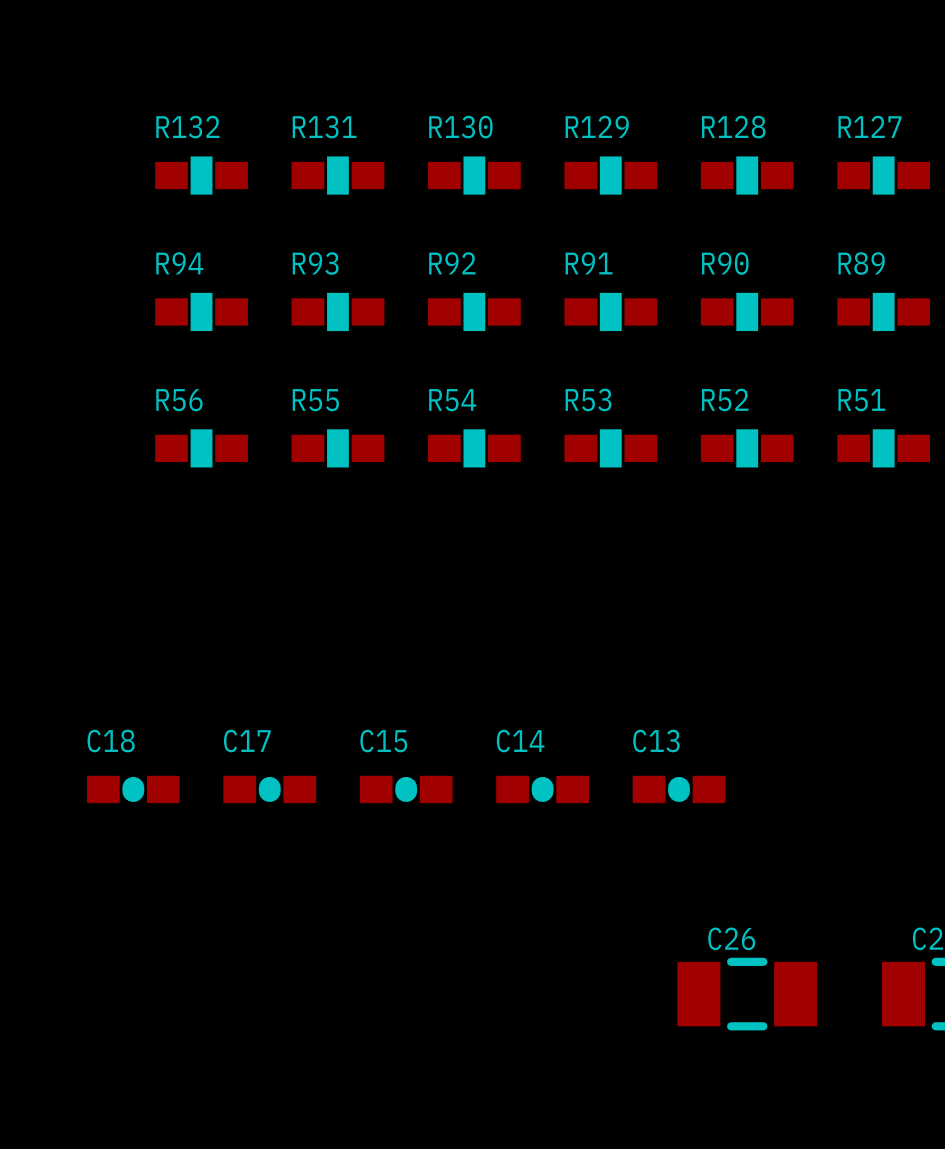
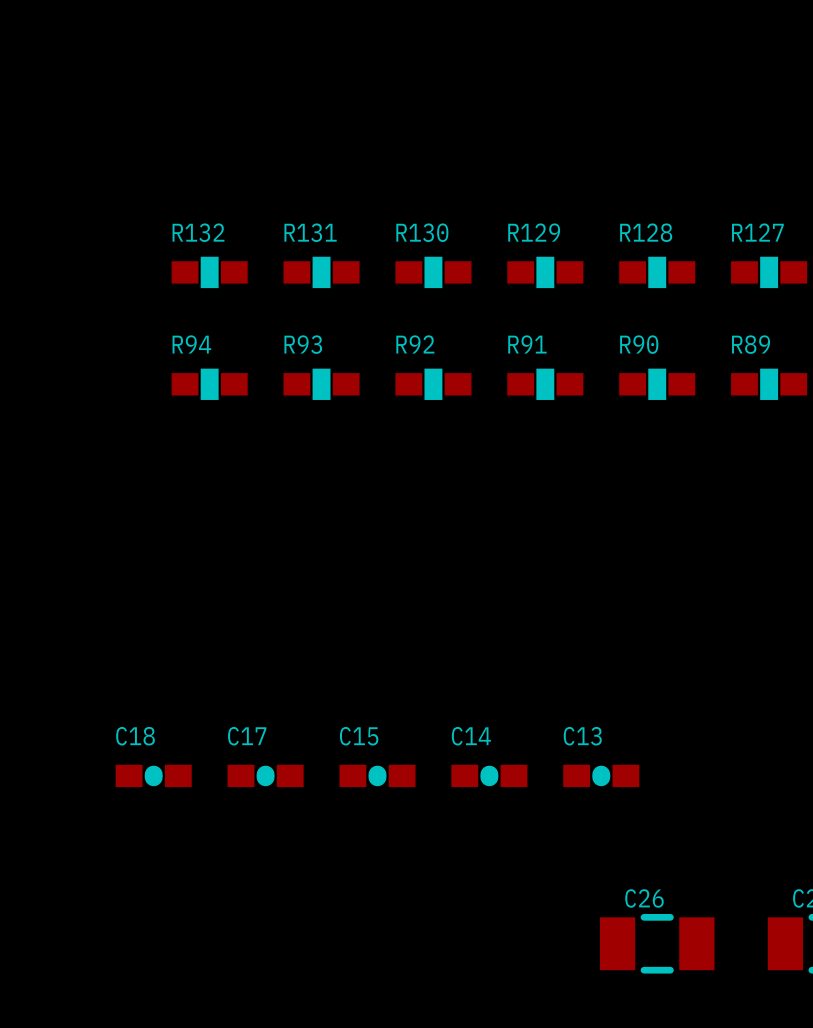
R56: (201, 448) -> none
R55: (337, 448) -> none
R54: (474, 448) -> none
R53: (610, 448) -> none
R52: (747, 448) -> none
R51: (883, 448) -> none

